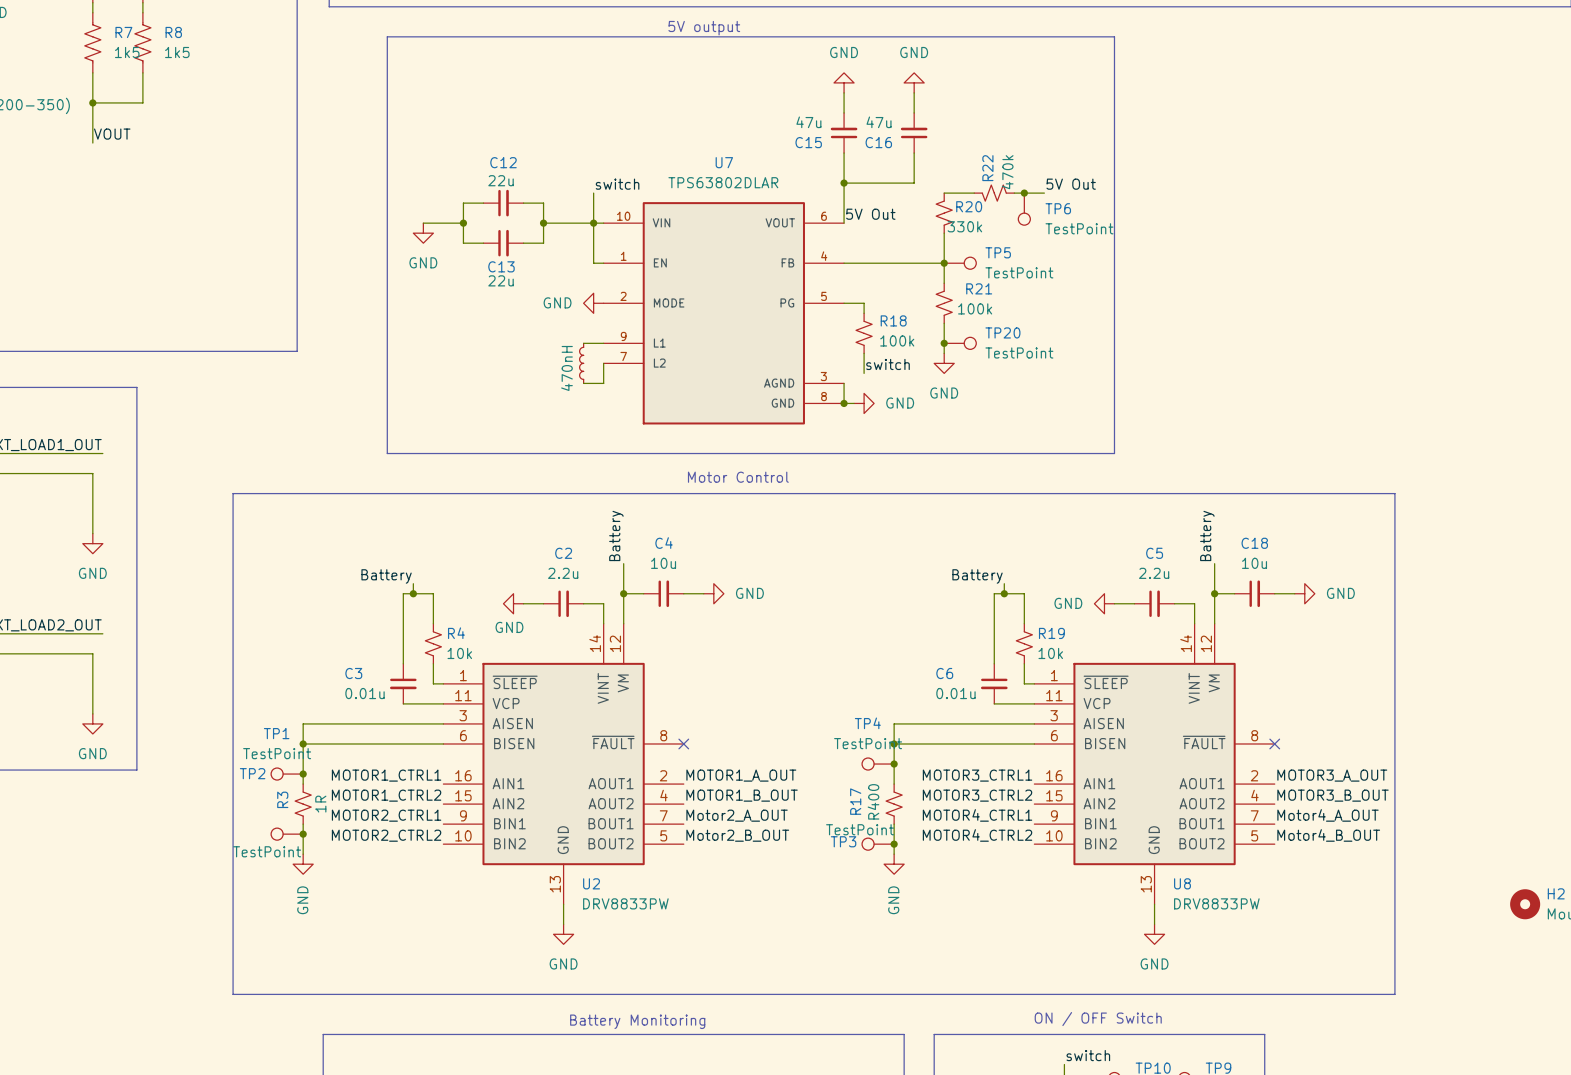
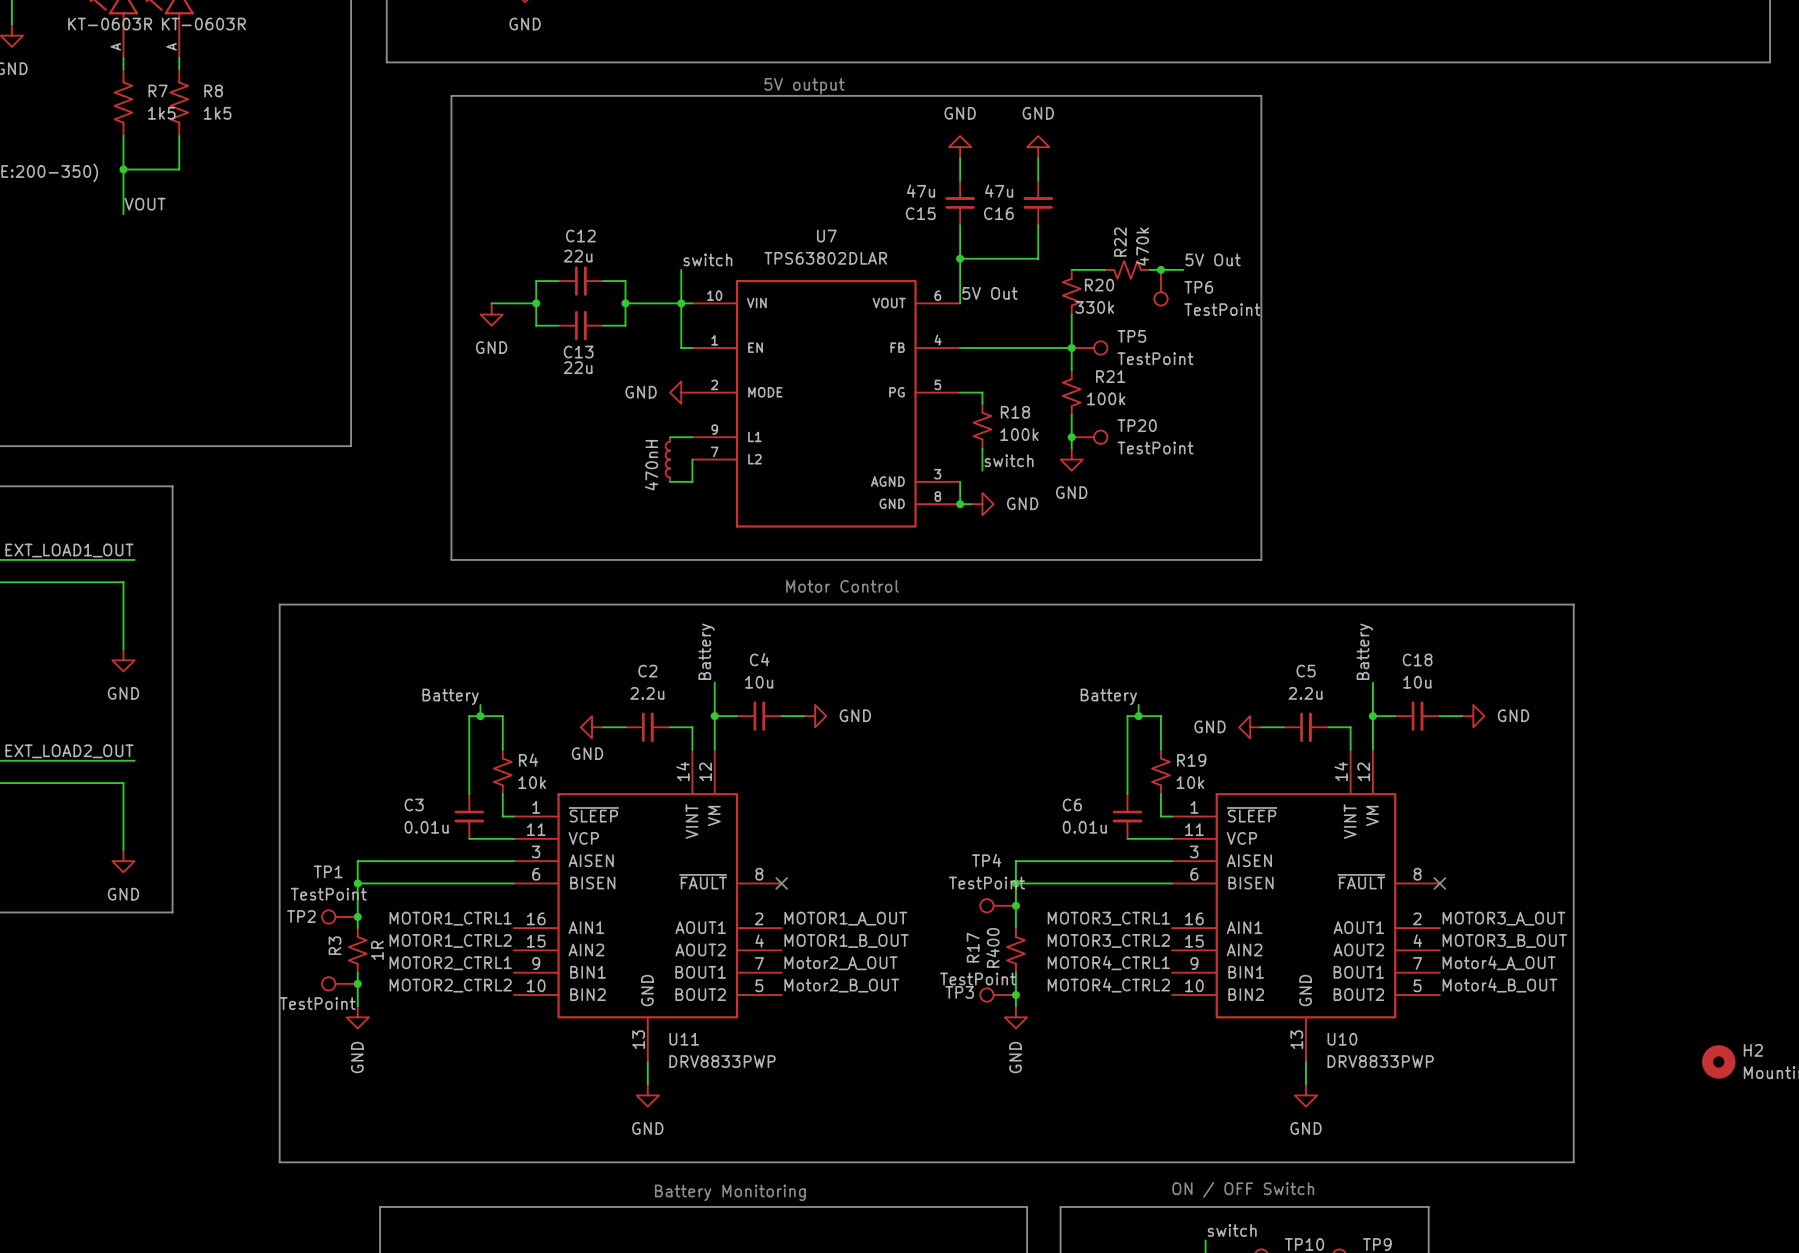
U2 name: U2 (591, 883) -> U11 (684, 1039)
U8 name: U8 (1182, 883) -> U10 (1342, 1039)
U2 value: DRV8833PW (625, 903) -> DRV8833PWP (722, 1061)
U8 value: DRV8833PW (1216, 903) -> DRV8833PWP (1380, 1061)

